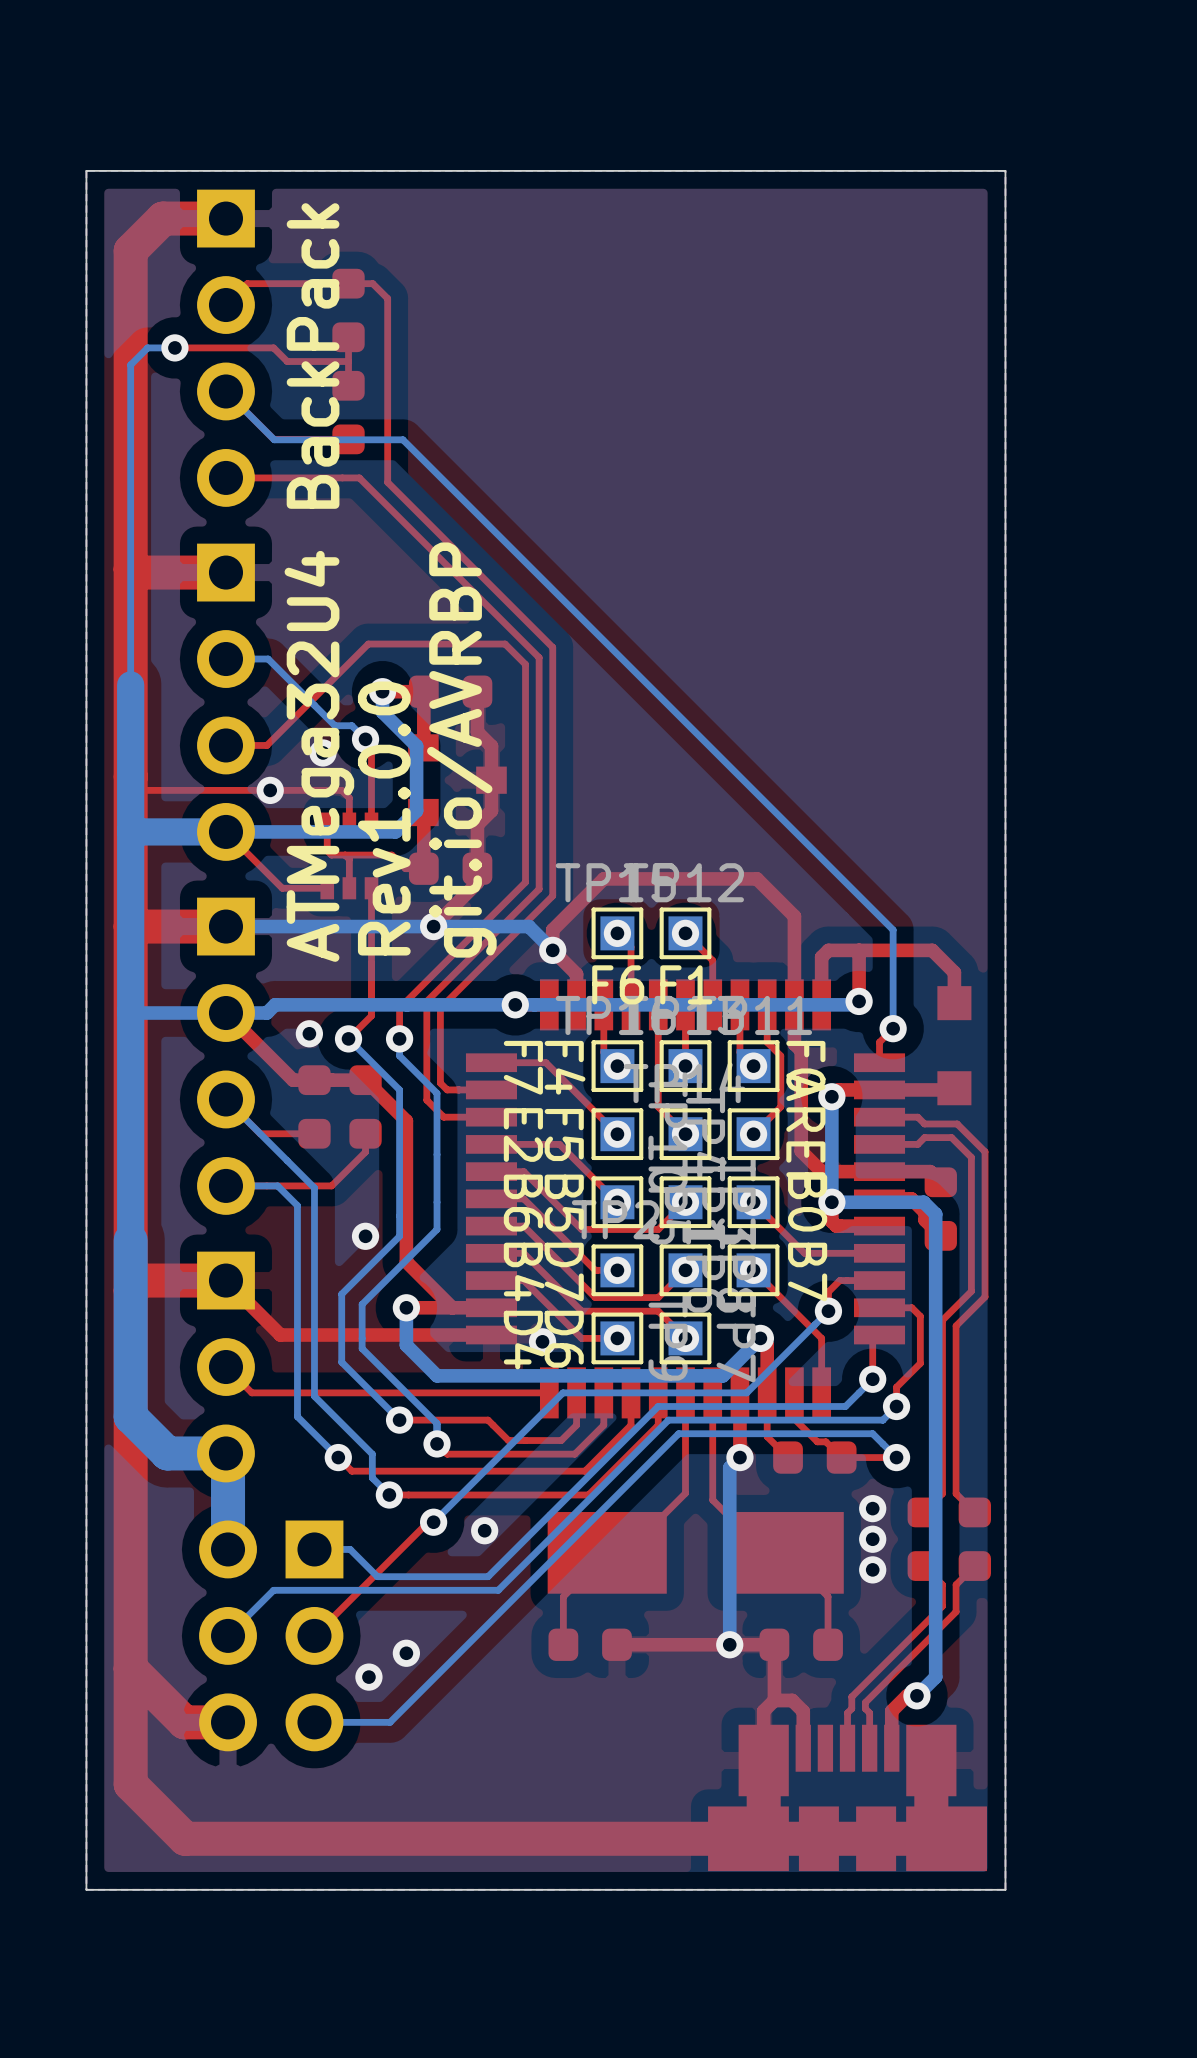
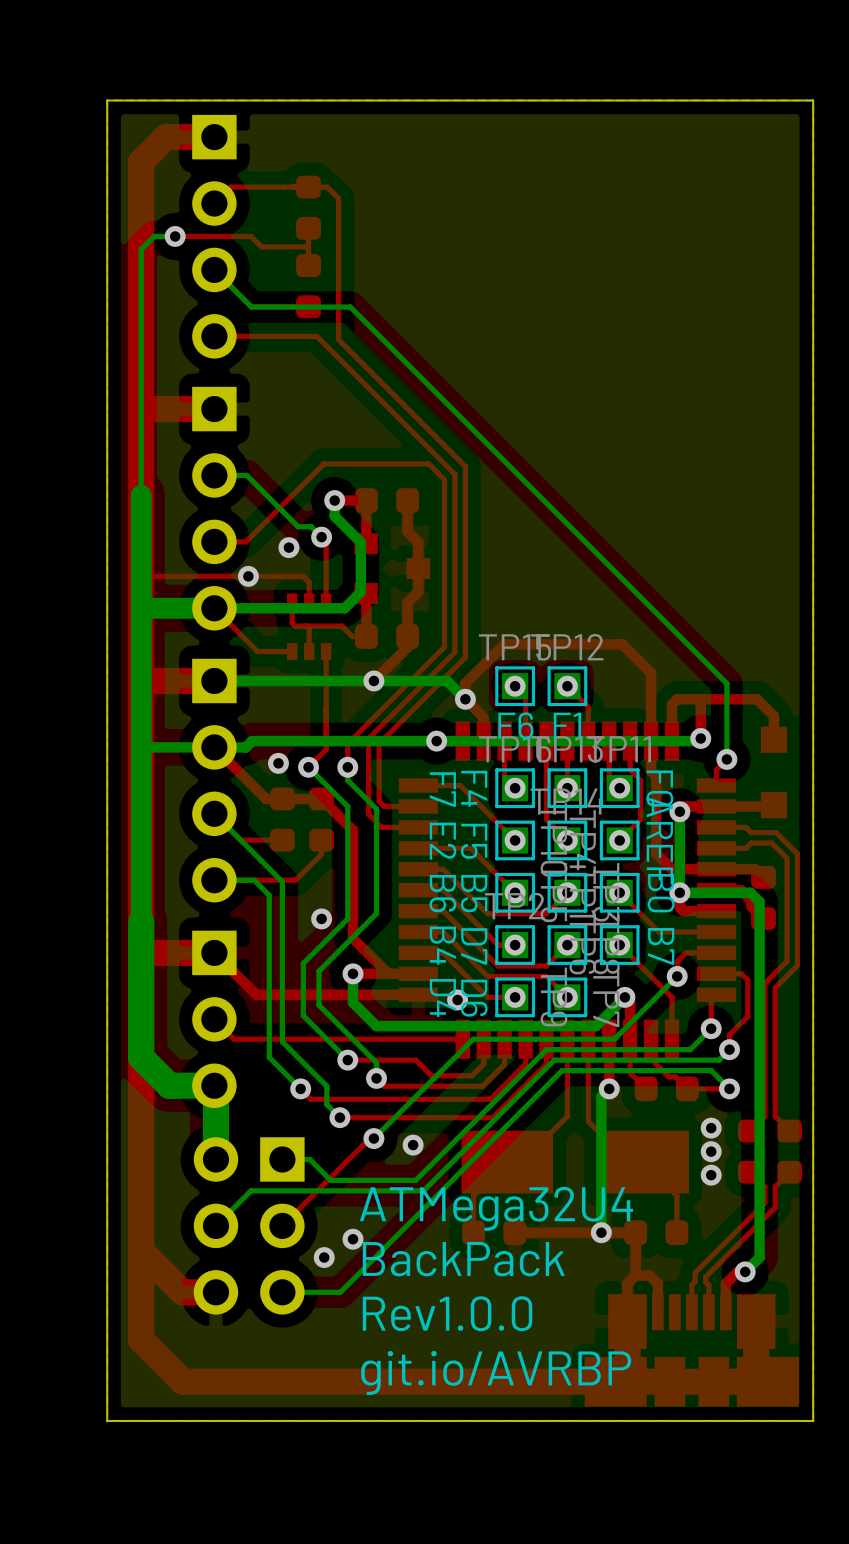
text: ATMega32U4 BackPack (319, 582) -> none
text: git.io/AVRBP (461, 750) -> none
text rotation: 0° (384, 818) -> 90° clockwise (447, 1313)
text position: Rev1.0.0 (384, 818) -> Rev1.0.0 (447, 1313)
text: none -> ATMega32U4 (496, 1208)
text: none -> BackPack (463, 1259)
text: none -> git.io/AVRBP (496, 1373)

